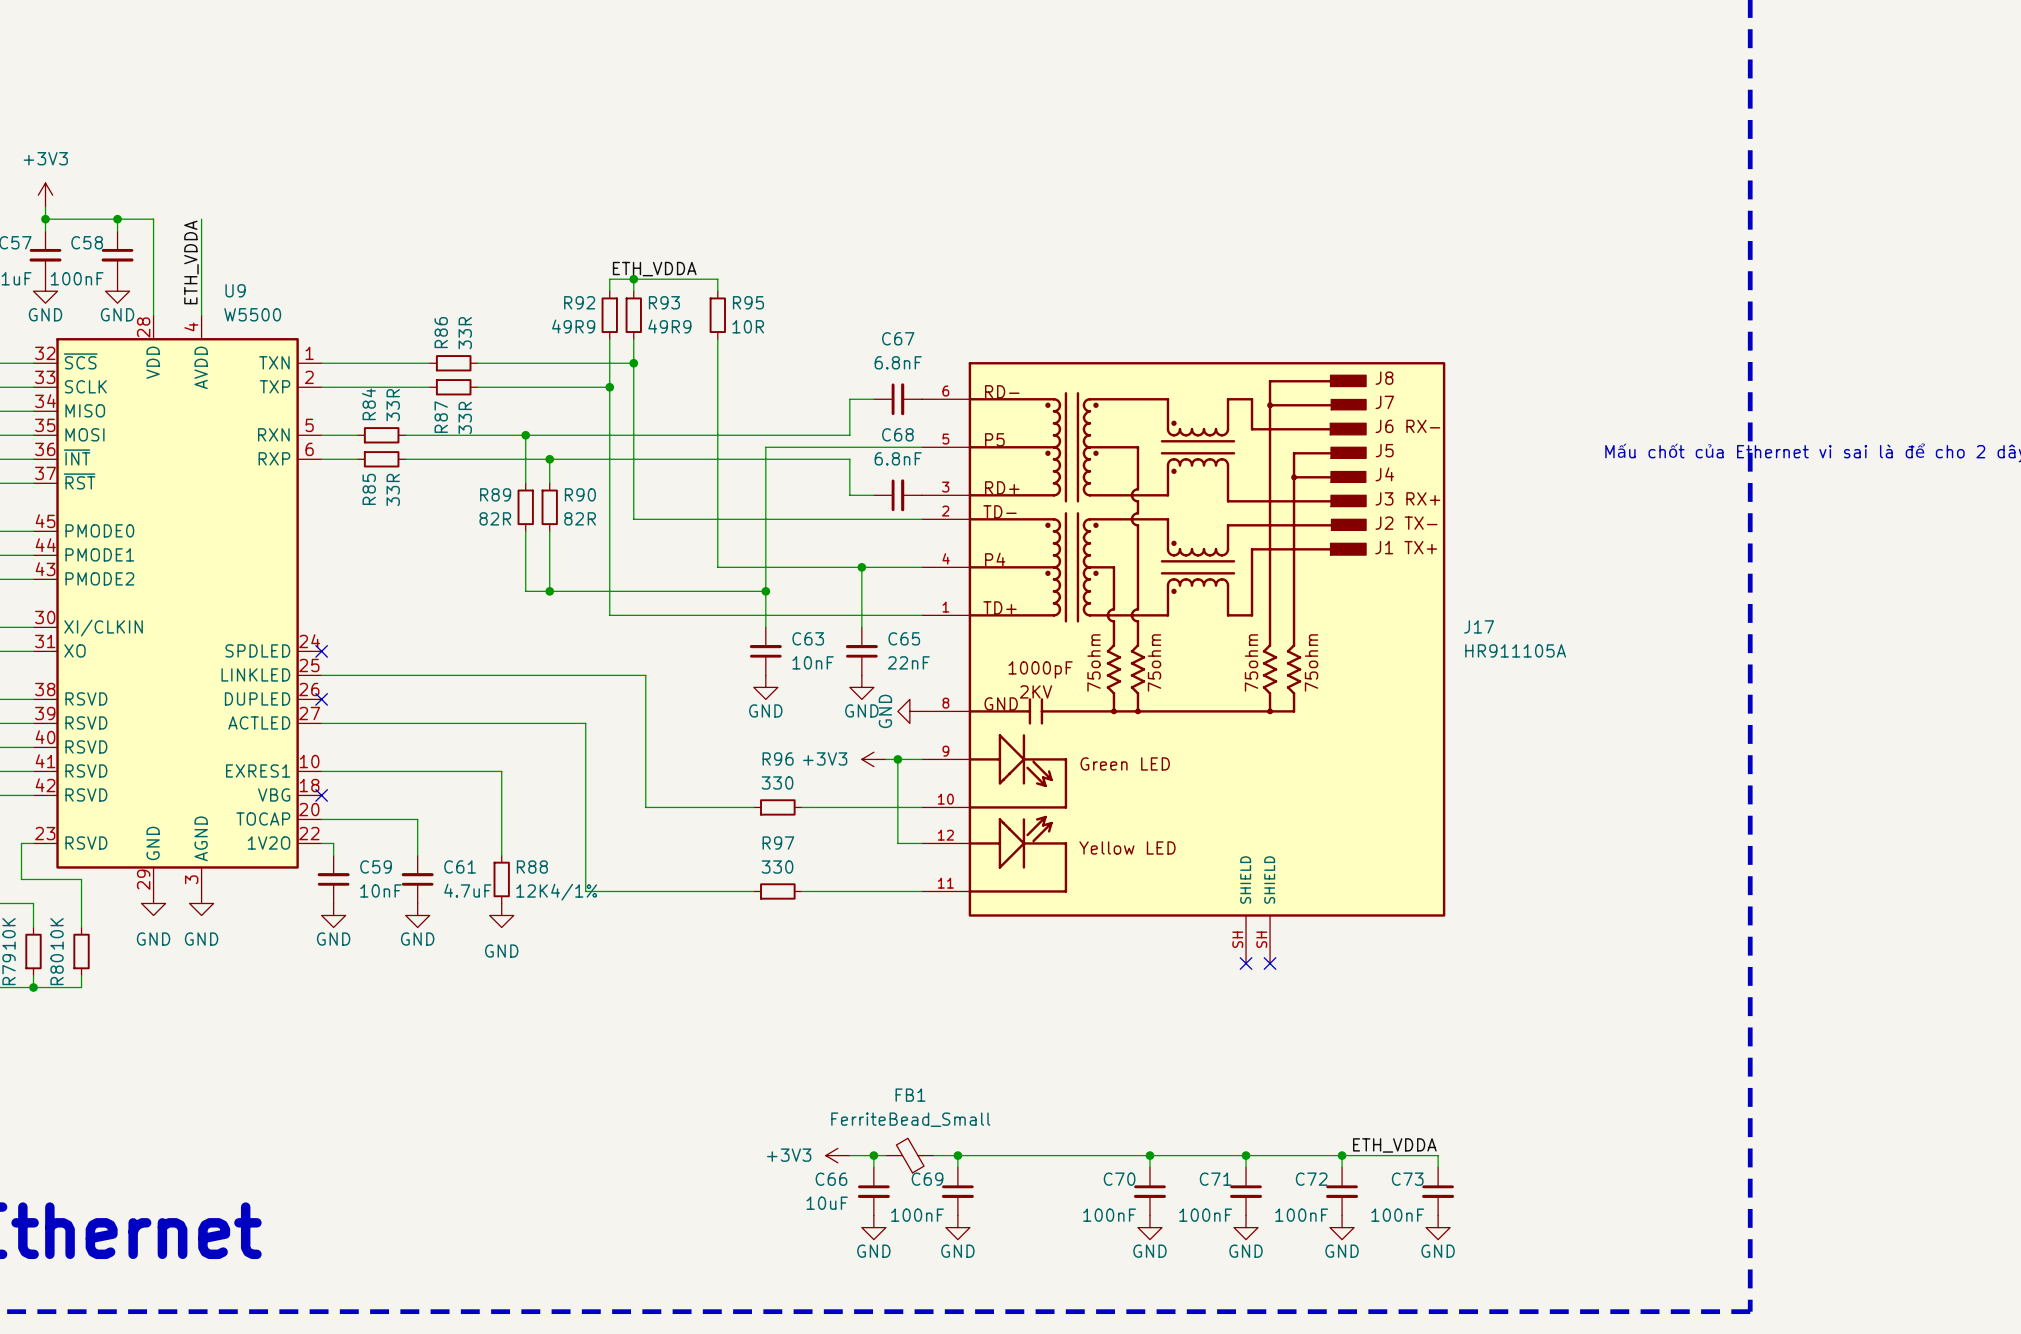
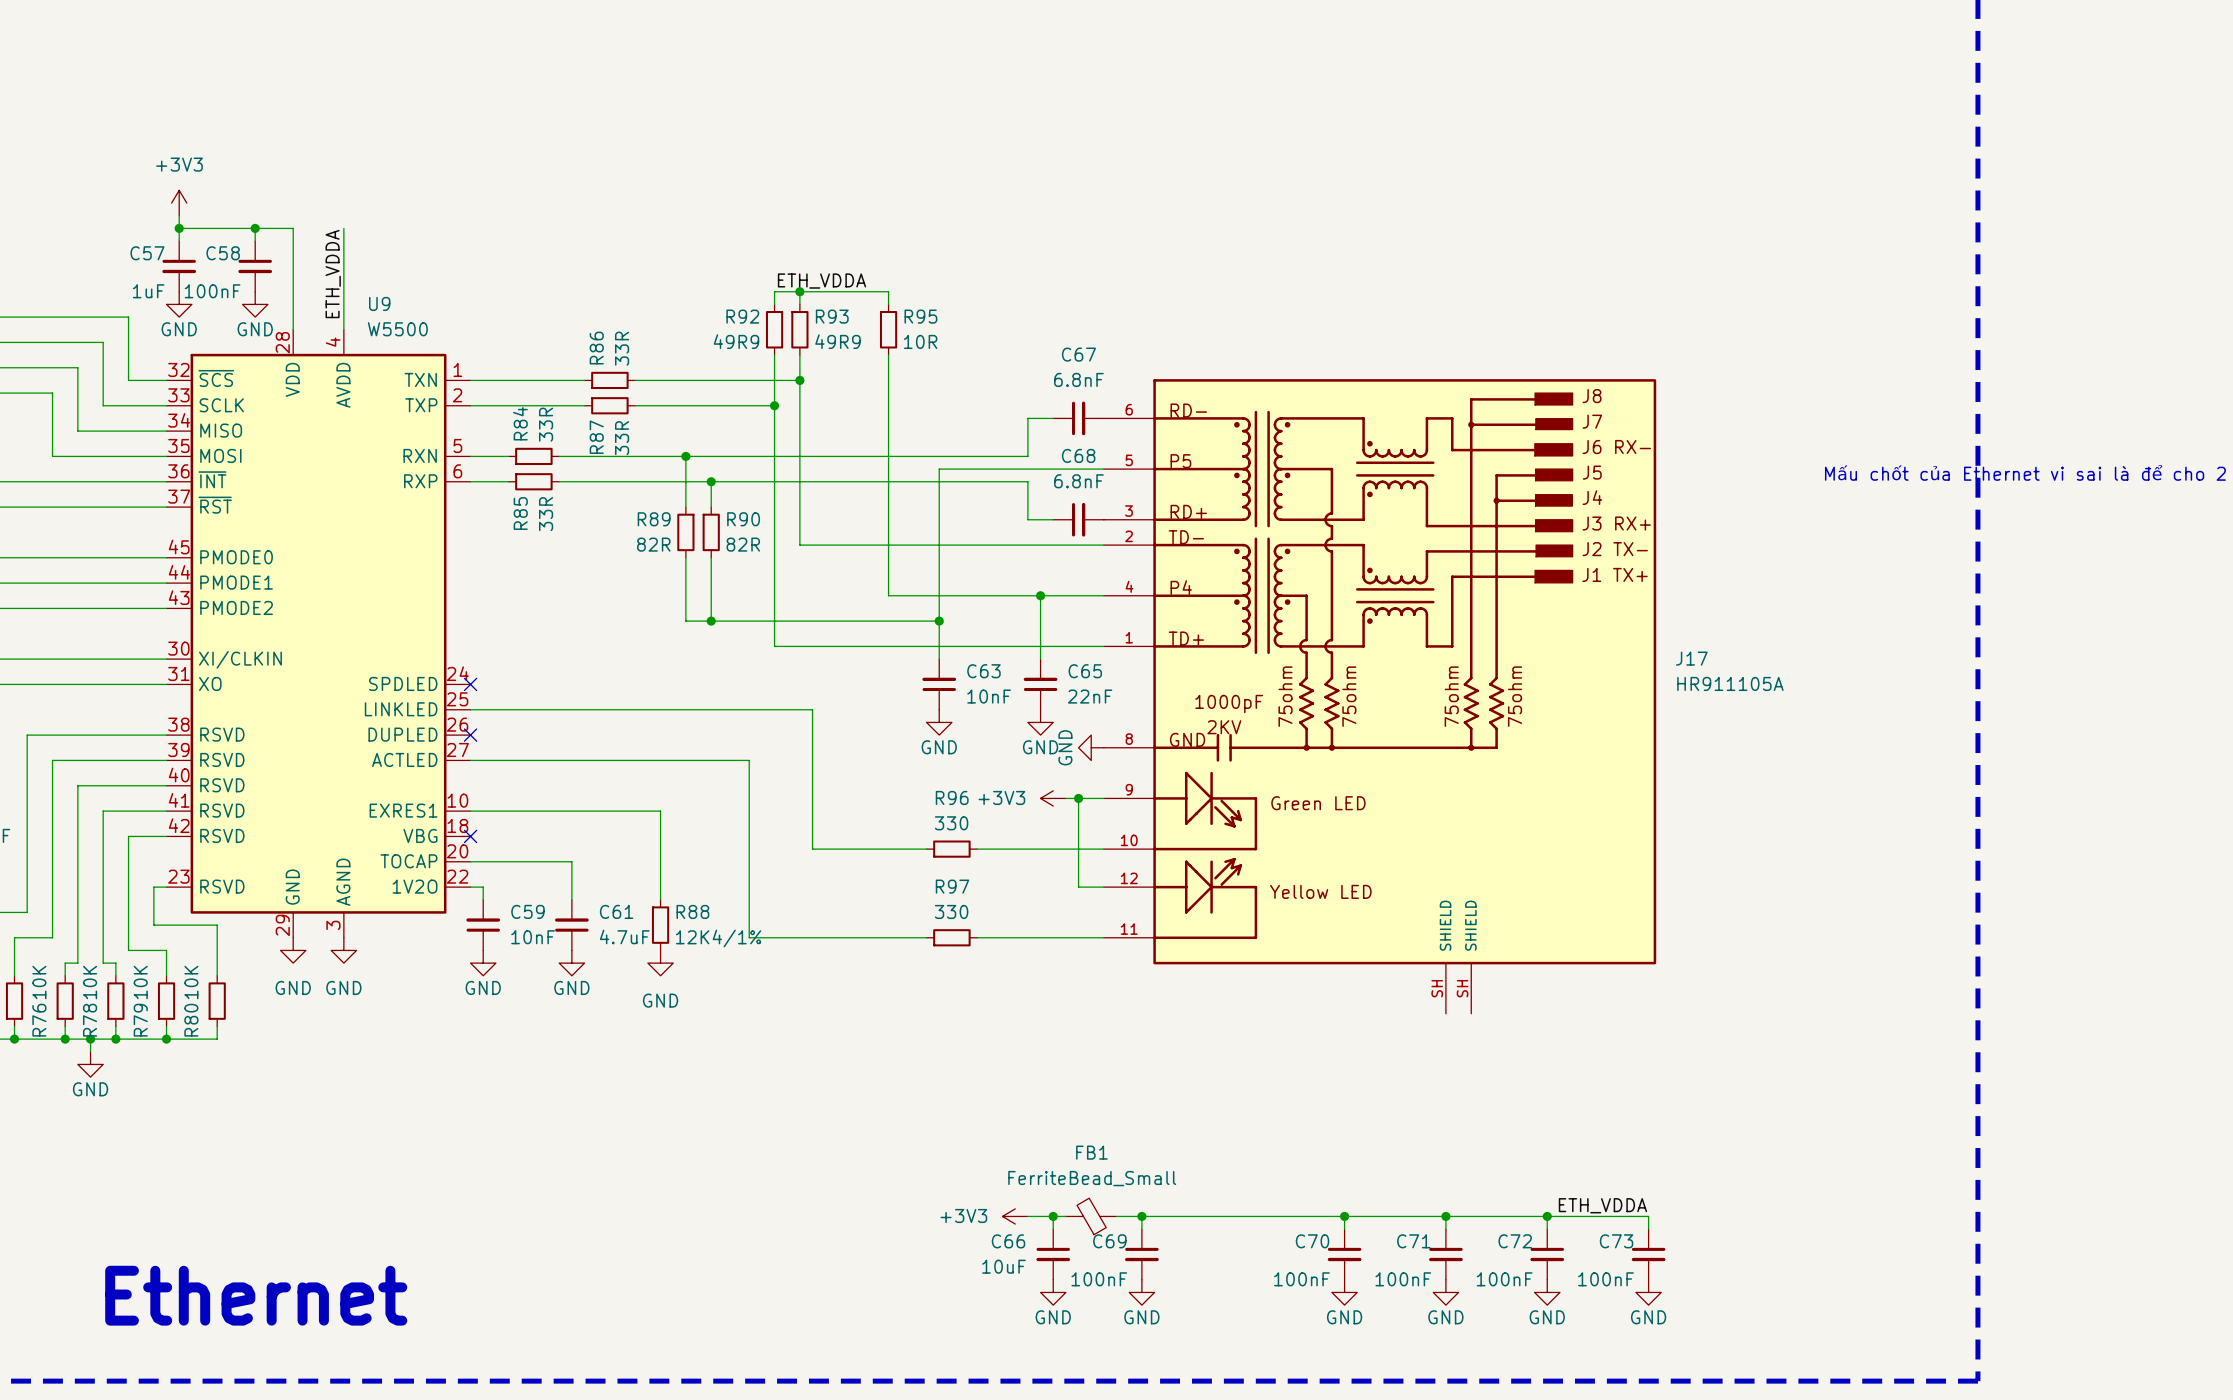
no-connect mark: (1246, 963) -> none
no-connect mark: (1270, 963) -> none

